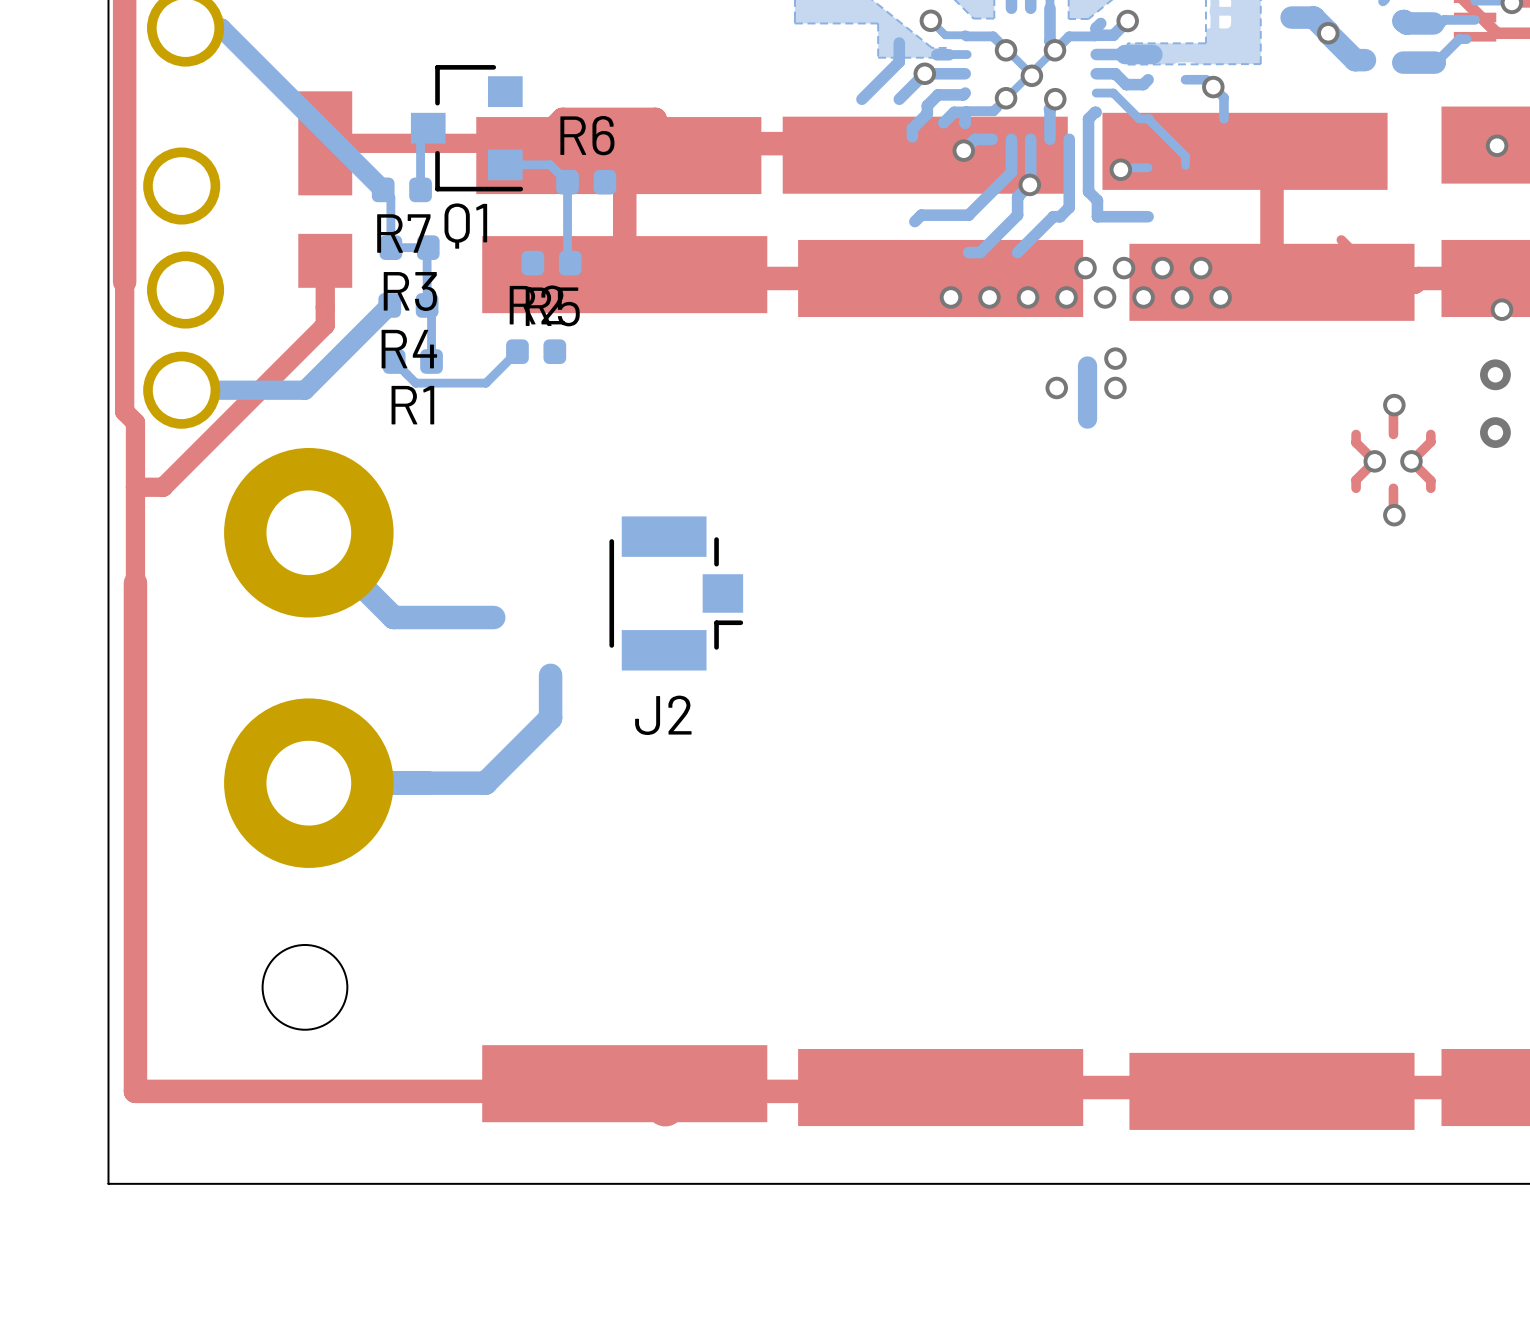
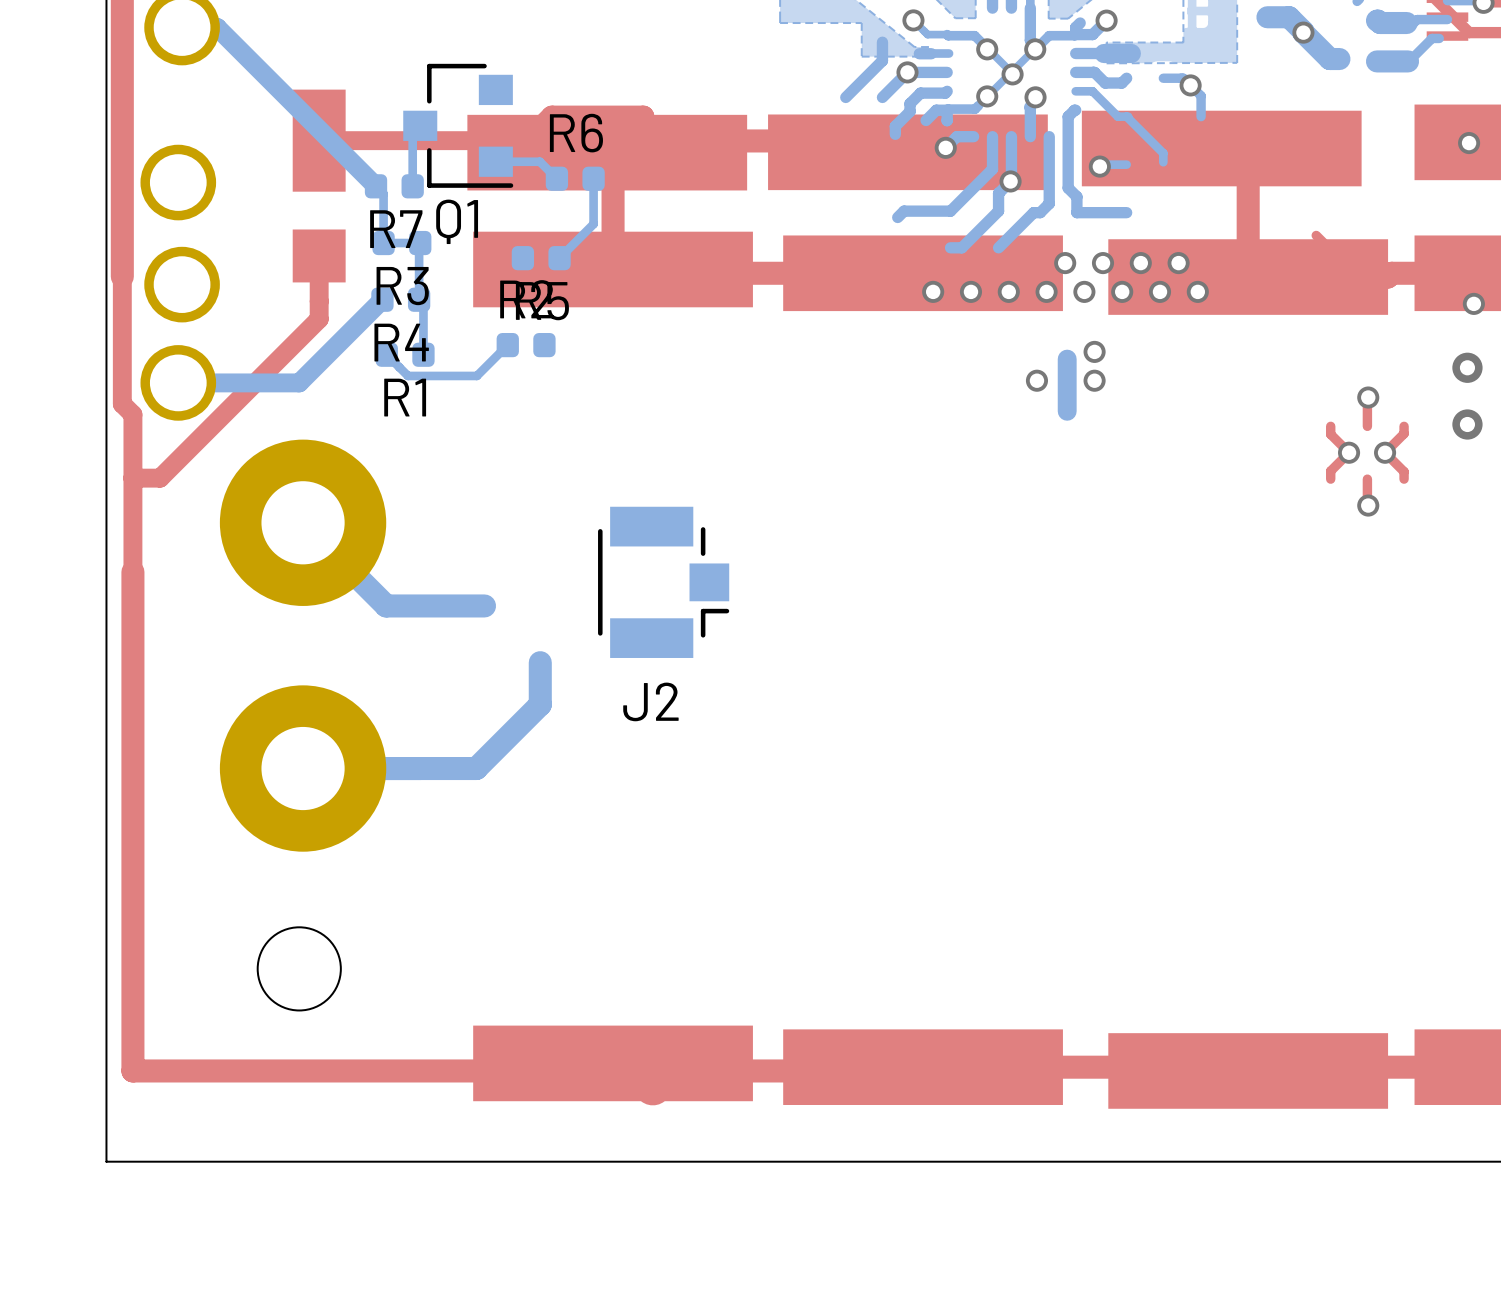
bottom track: (567, 182) (567, 260) (570, 263) -> (593, 178) (593, 224) (559, 258)

